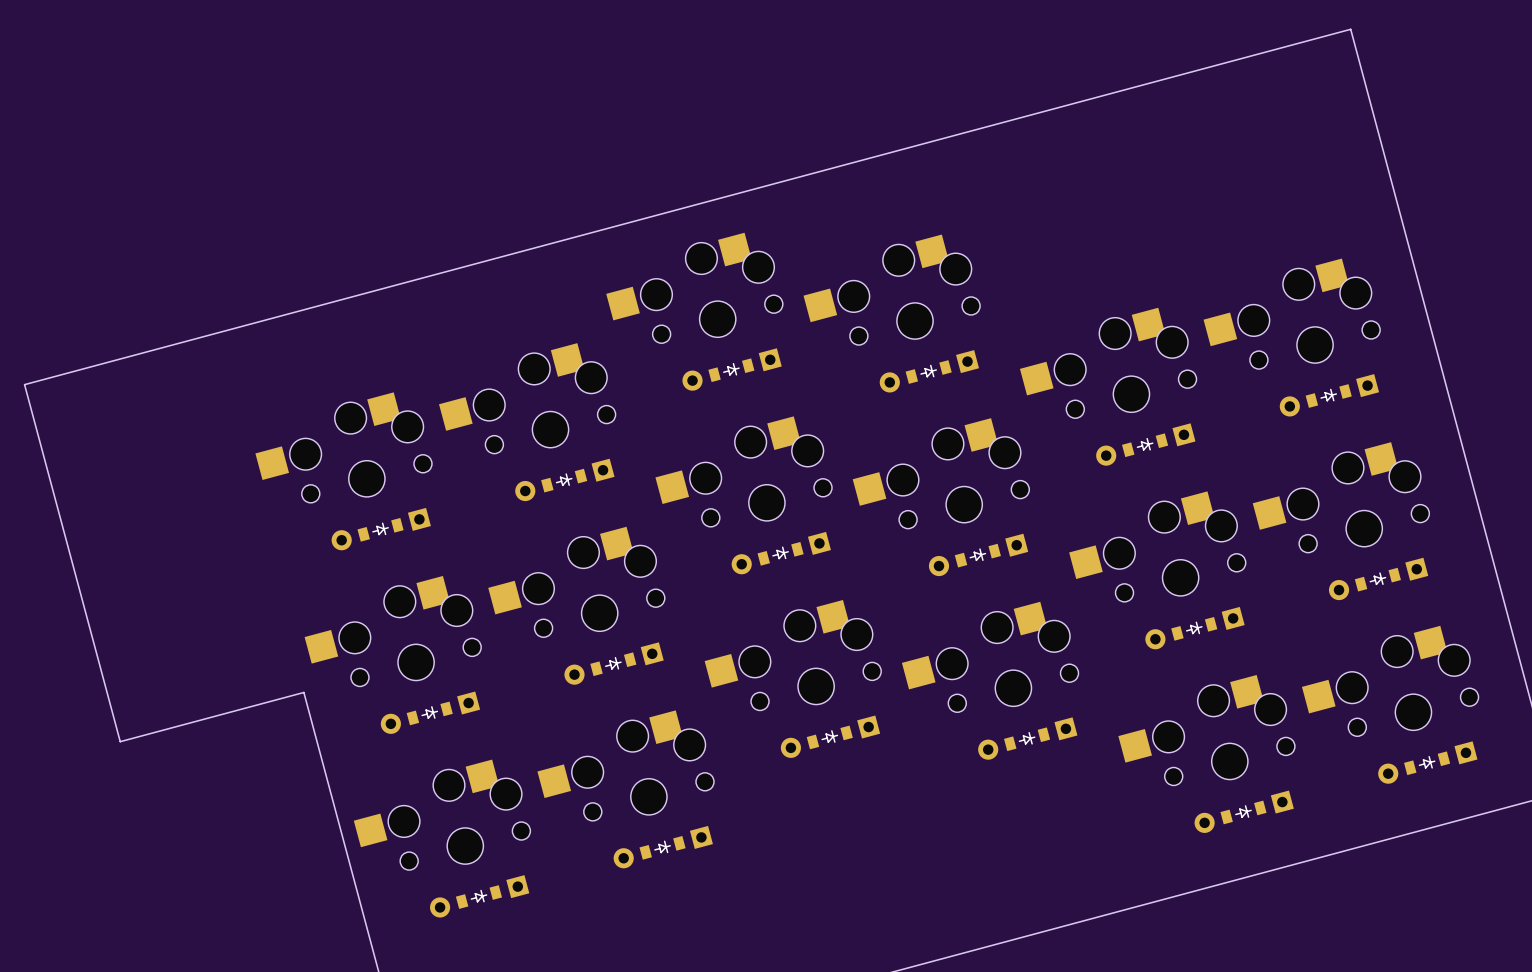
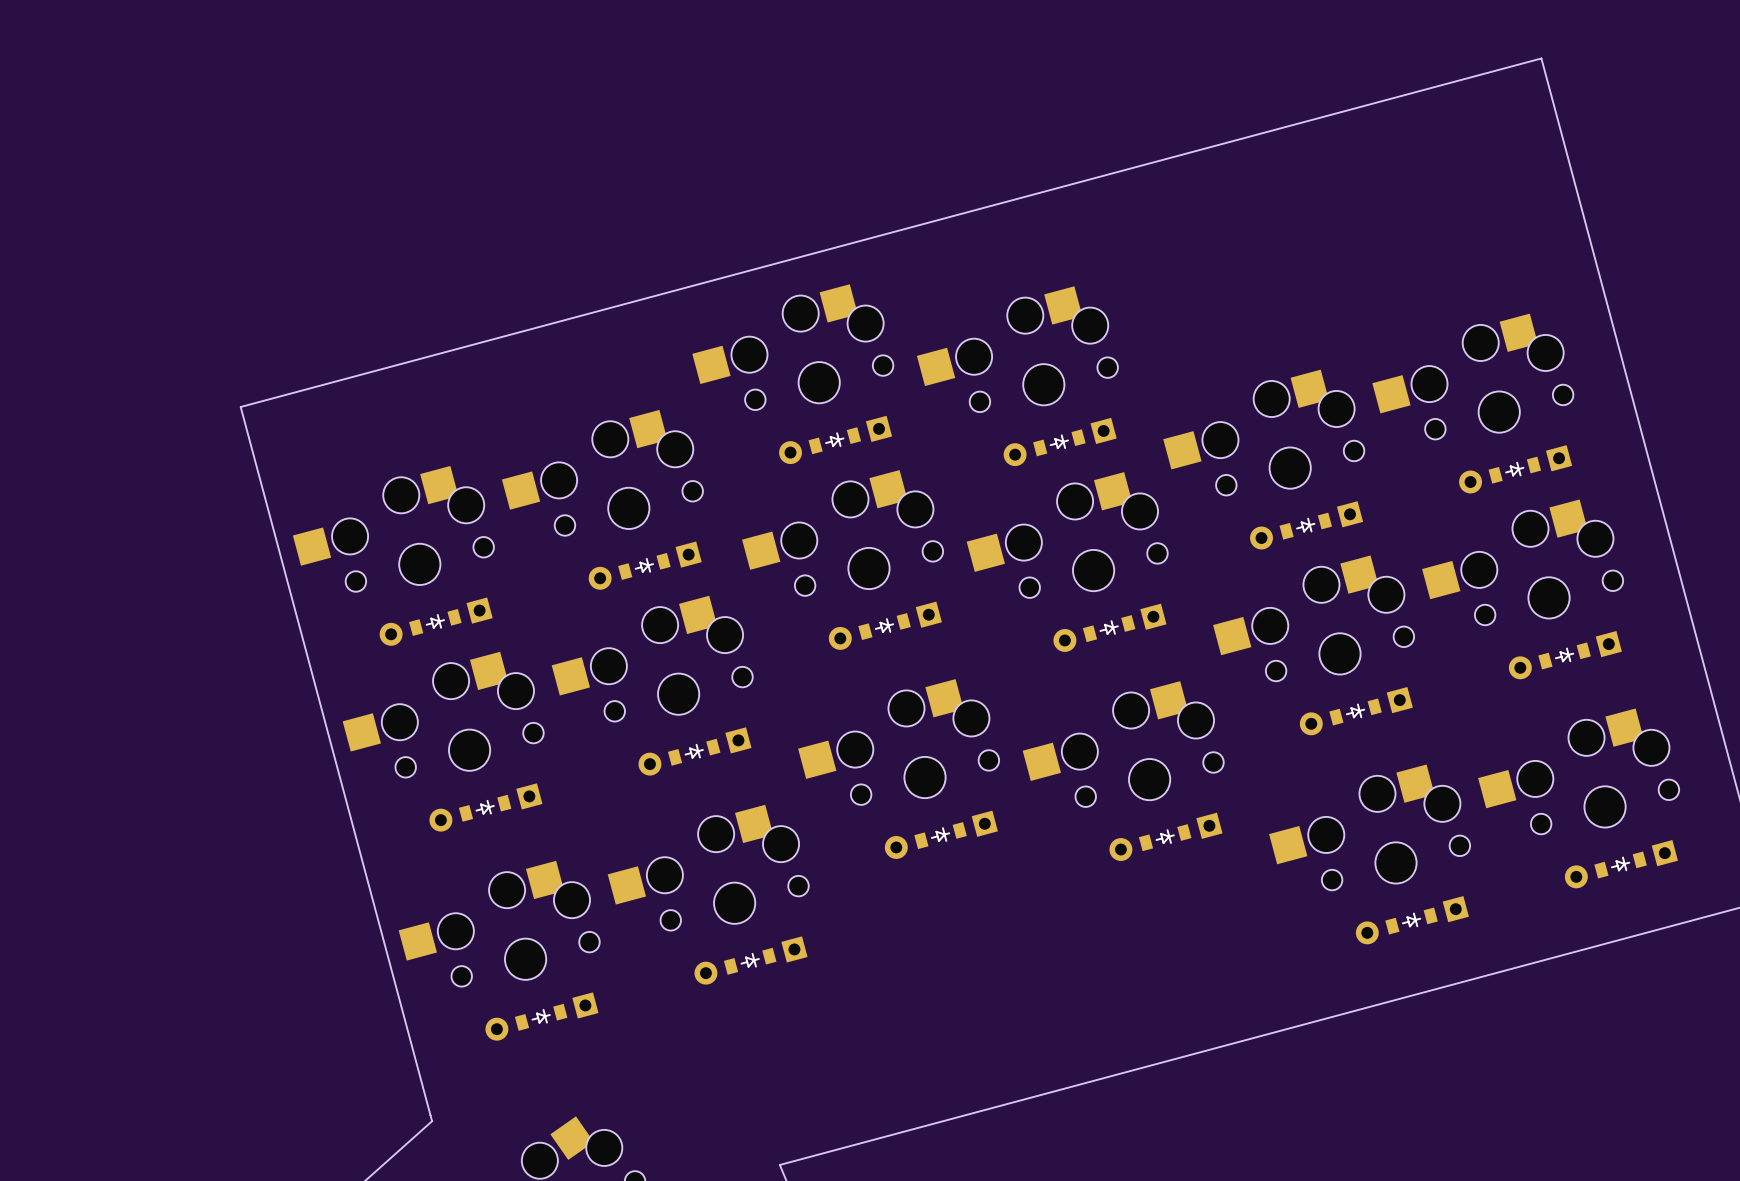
board edge: (1357, 54) (1350, 29) (24, 384) (120, 741) (303, 692) -> (1541, 58) (240, 406) (341, 784)
part position: (694, 287) -> (792, 347)
part position: (891, 289) -> (1017, 349)
part position: (1291, 313) -> (1472, 376)
part position: (1108, 362) -> (1263, 432)
part: (732, 369) -> none
part position: (929, 371) -> (1060, 441)
part: none -> (835, 439)
part position: (1329, 395) -> (1515, 469)
part position: (527, 398) -> (602, 472)
part position: (1145, 444) -> (1306, 525)
part position: (343, 447) -> (393, 528)
part: (564, 479) -> none
part: none -> (645, 565)
part position: (381, 529) -> (436, 621)

